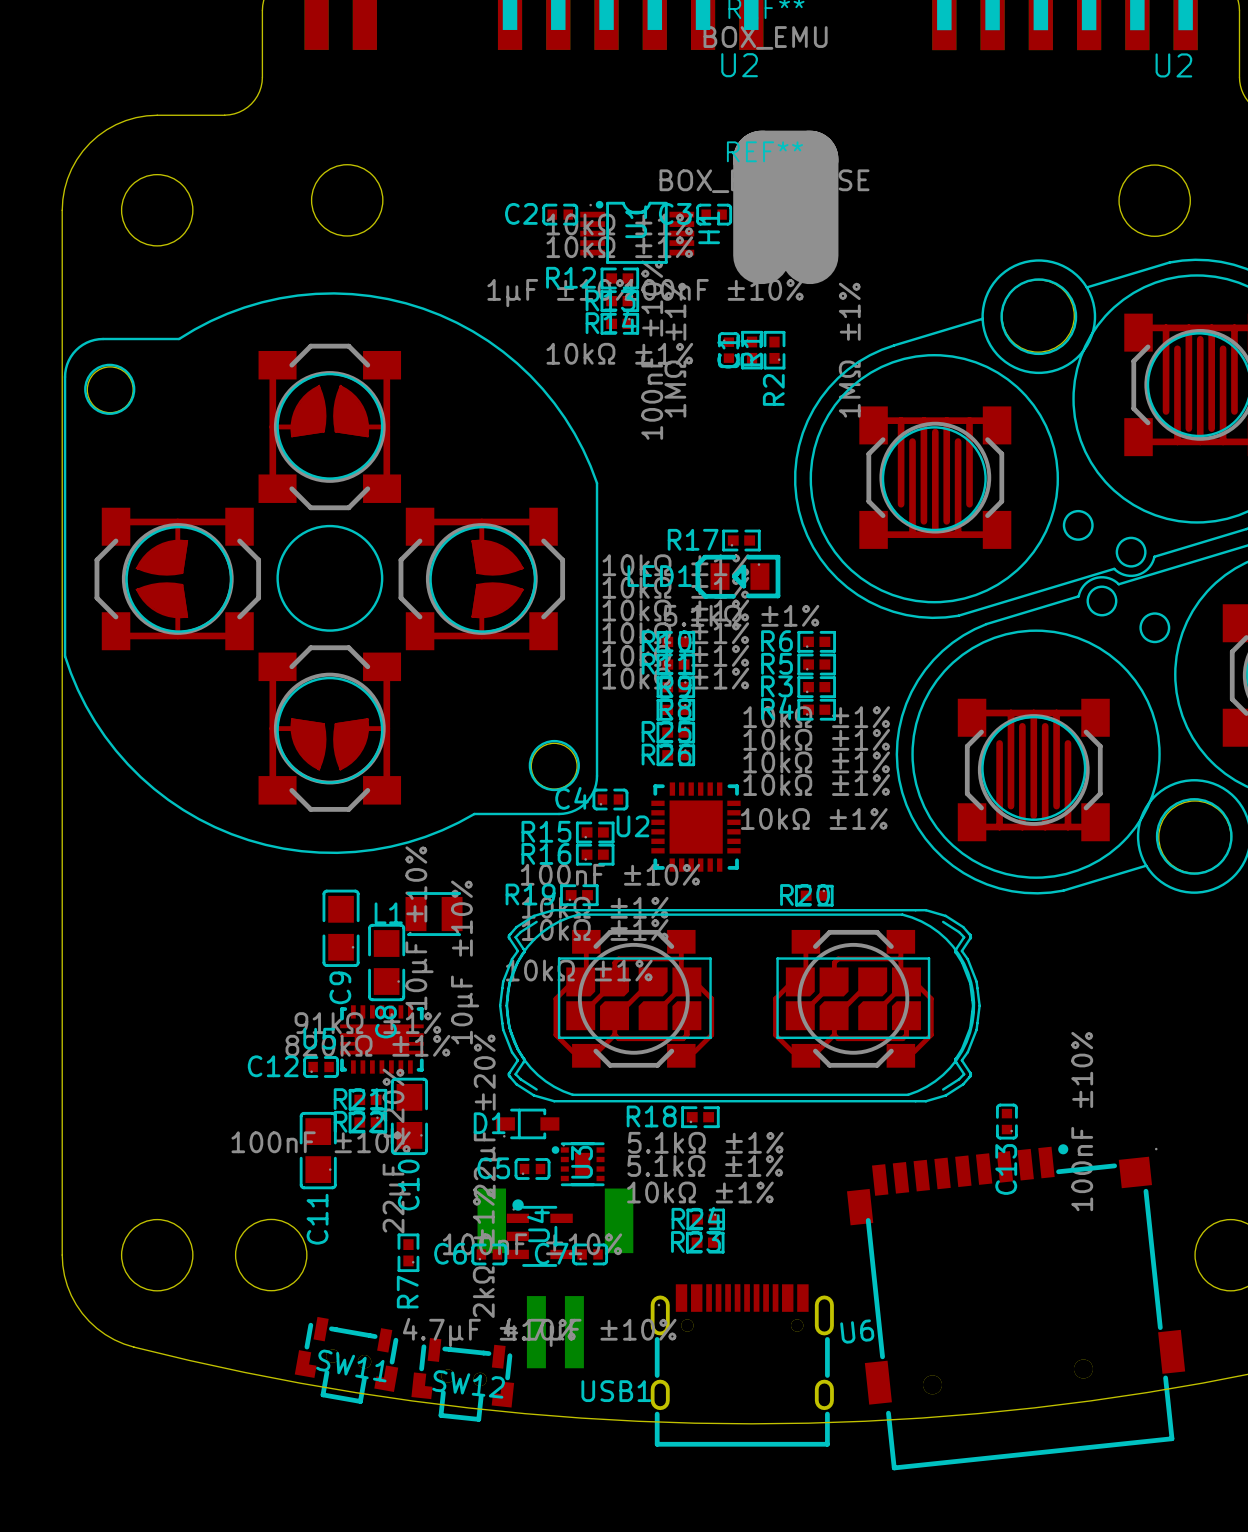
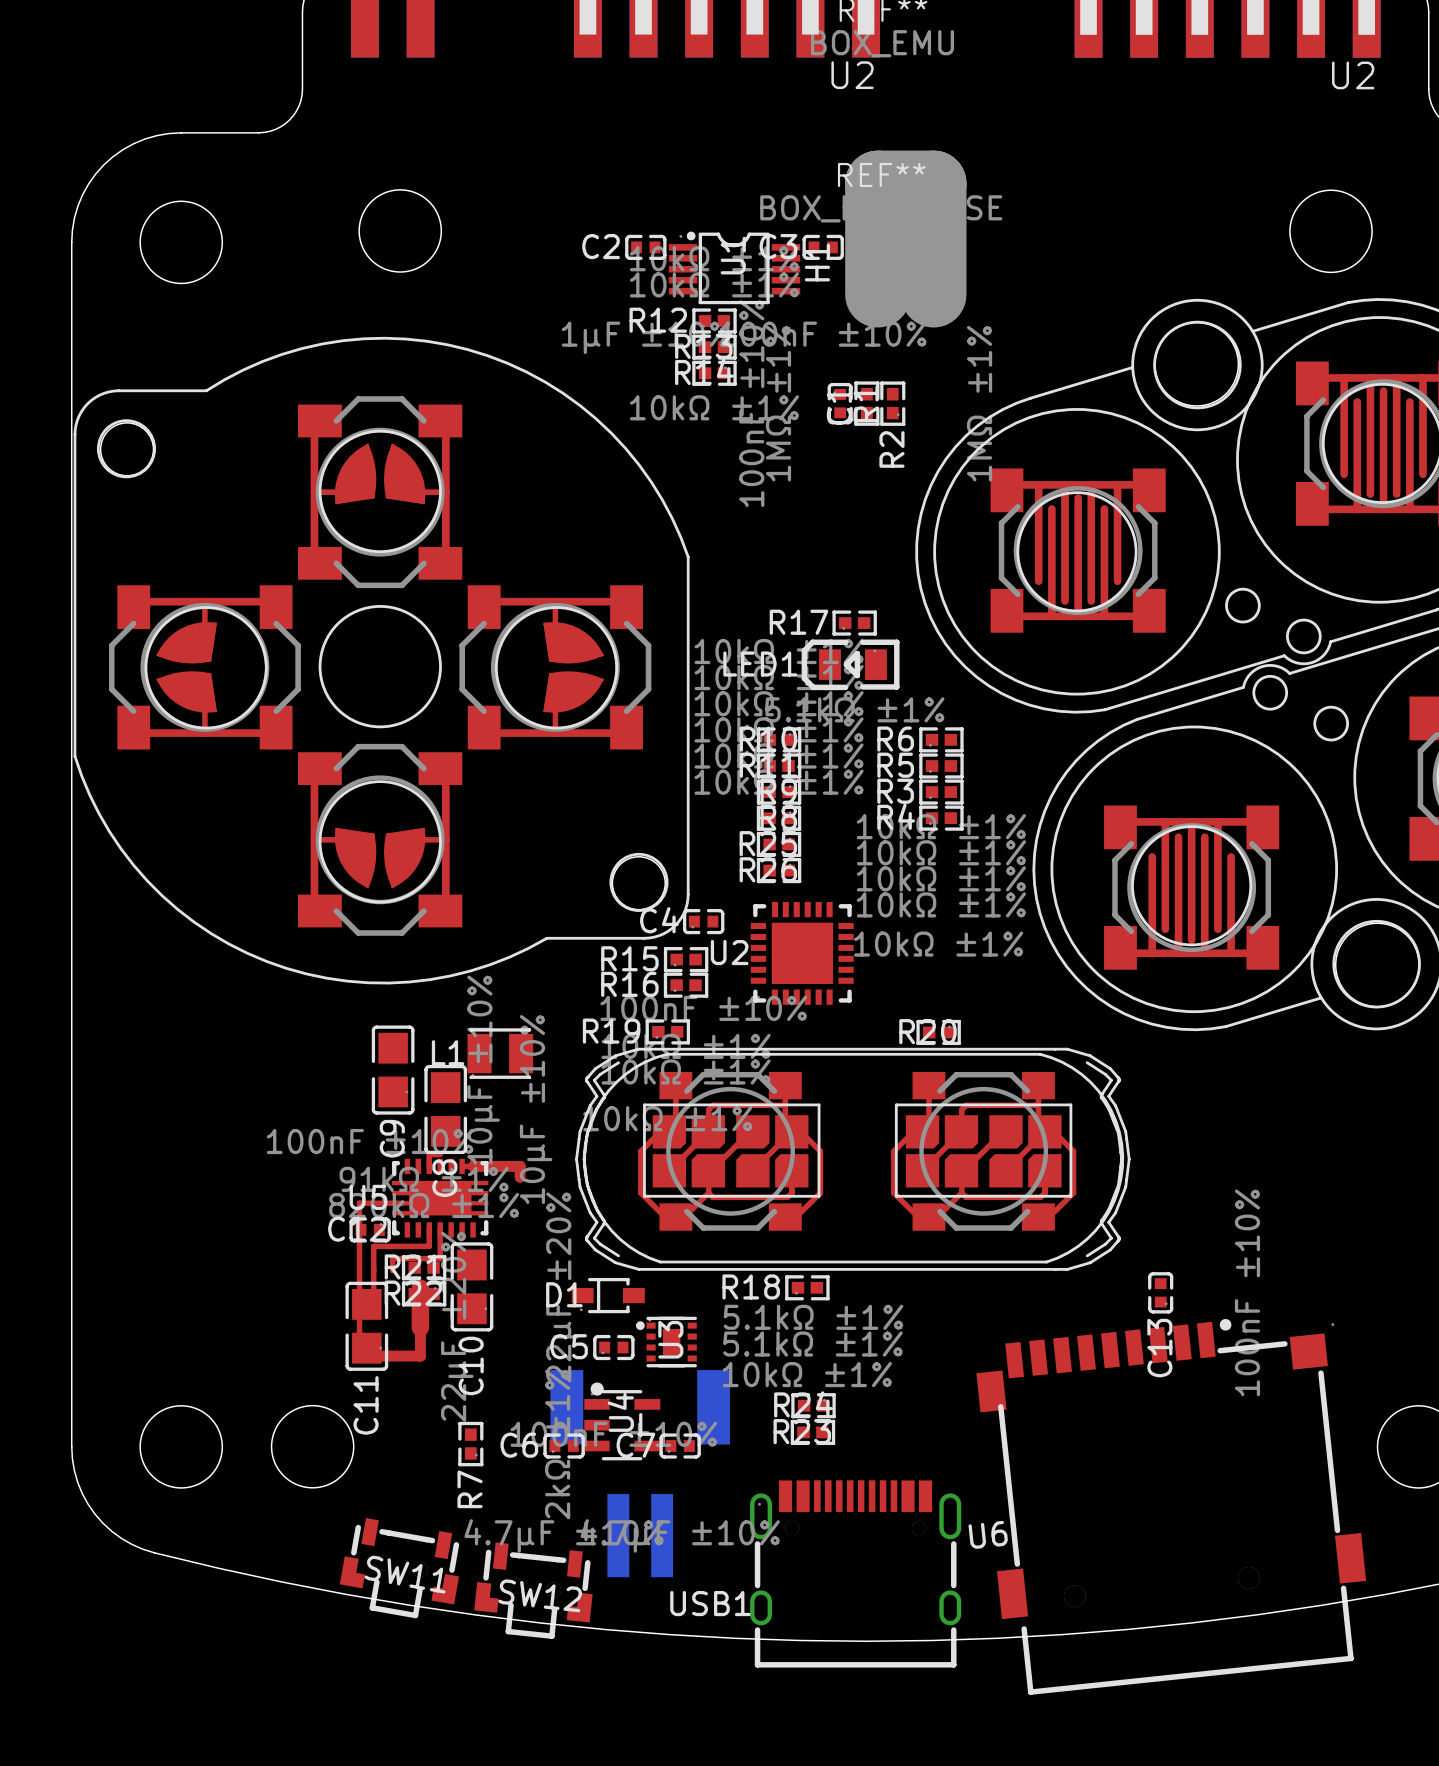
top track: none -> (440, 1154) (429, 1154) (429, 1166)
top track: none -> (462, 1166) (520, 1166) (520, 1177)
top track: none -> (402, 1203) (359, 1203) (359, 1356) (420, 1356) (420, 1288)
C12 rotation: 0° (321, 1067) -> 180° (370, 1229)
top track: none -> (429, 1229) (429, 1246) (373, 1246) (373, 1290)
top track: none -> (440, 1229) (440, 1258) (392, 1258) (392, 1270)

